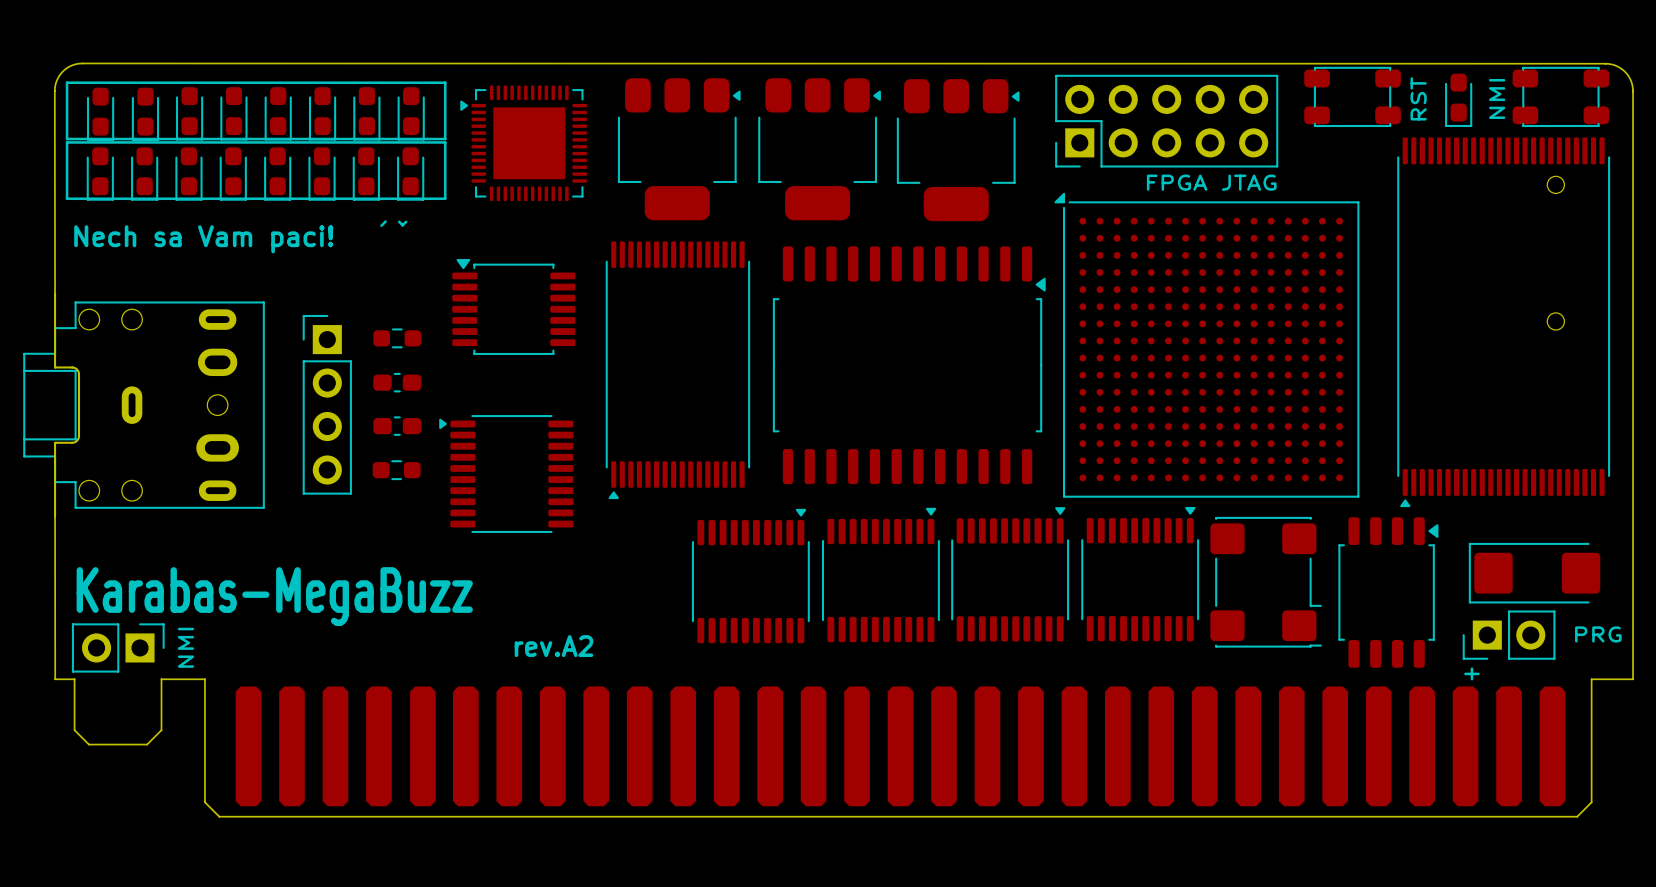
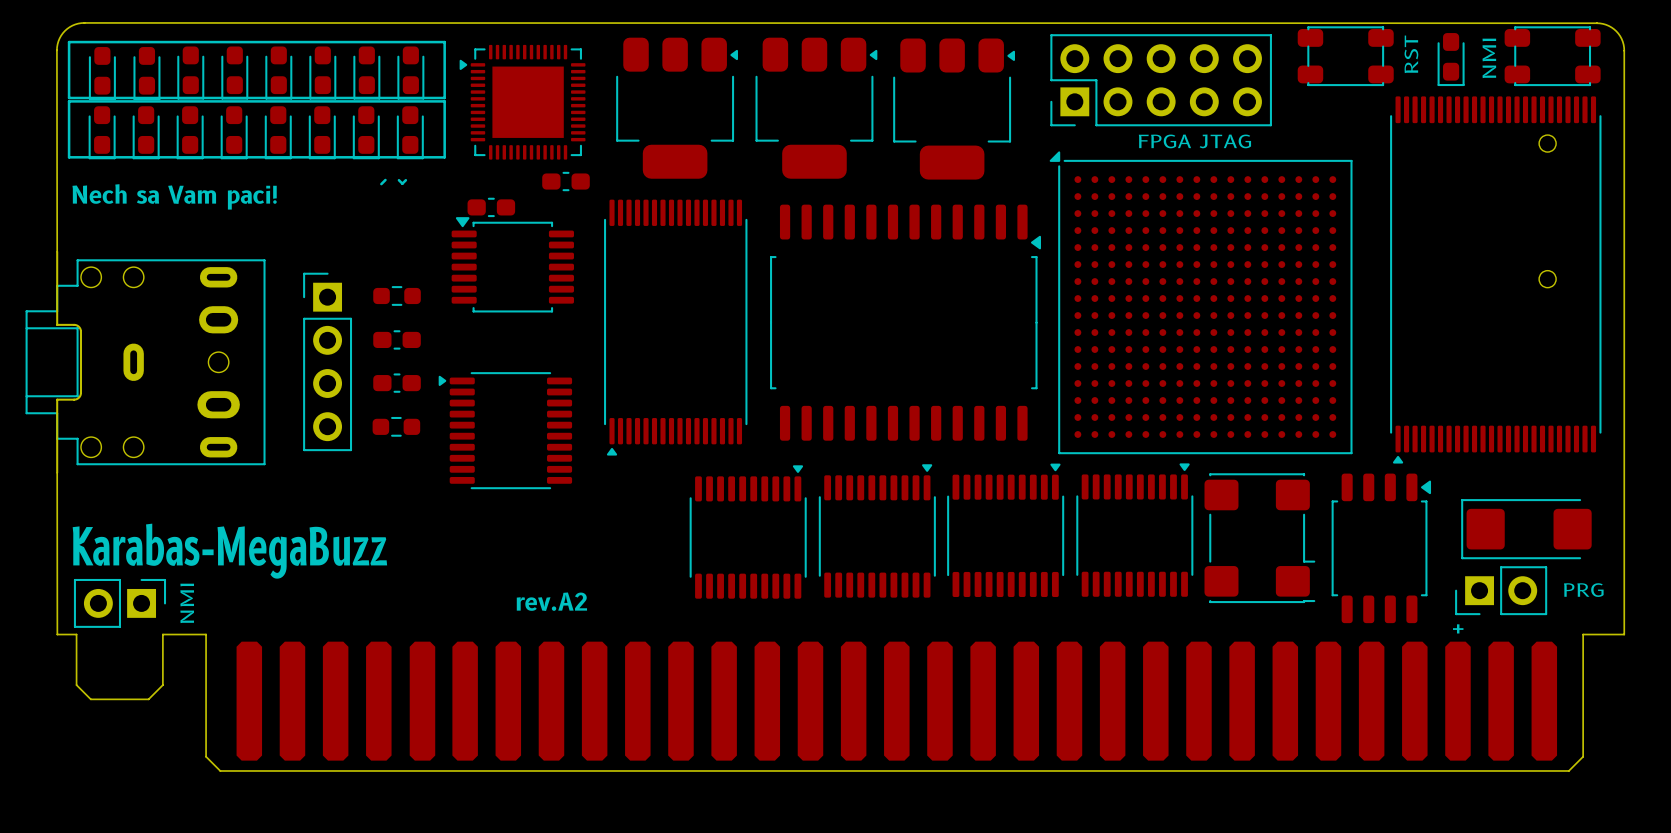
part: none -> (566, 181)
part: none -> (491, 207)

